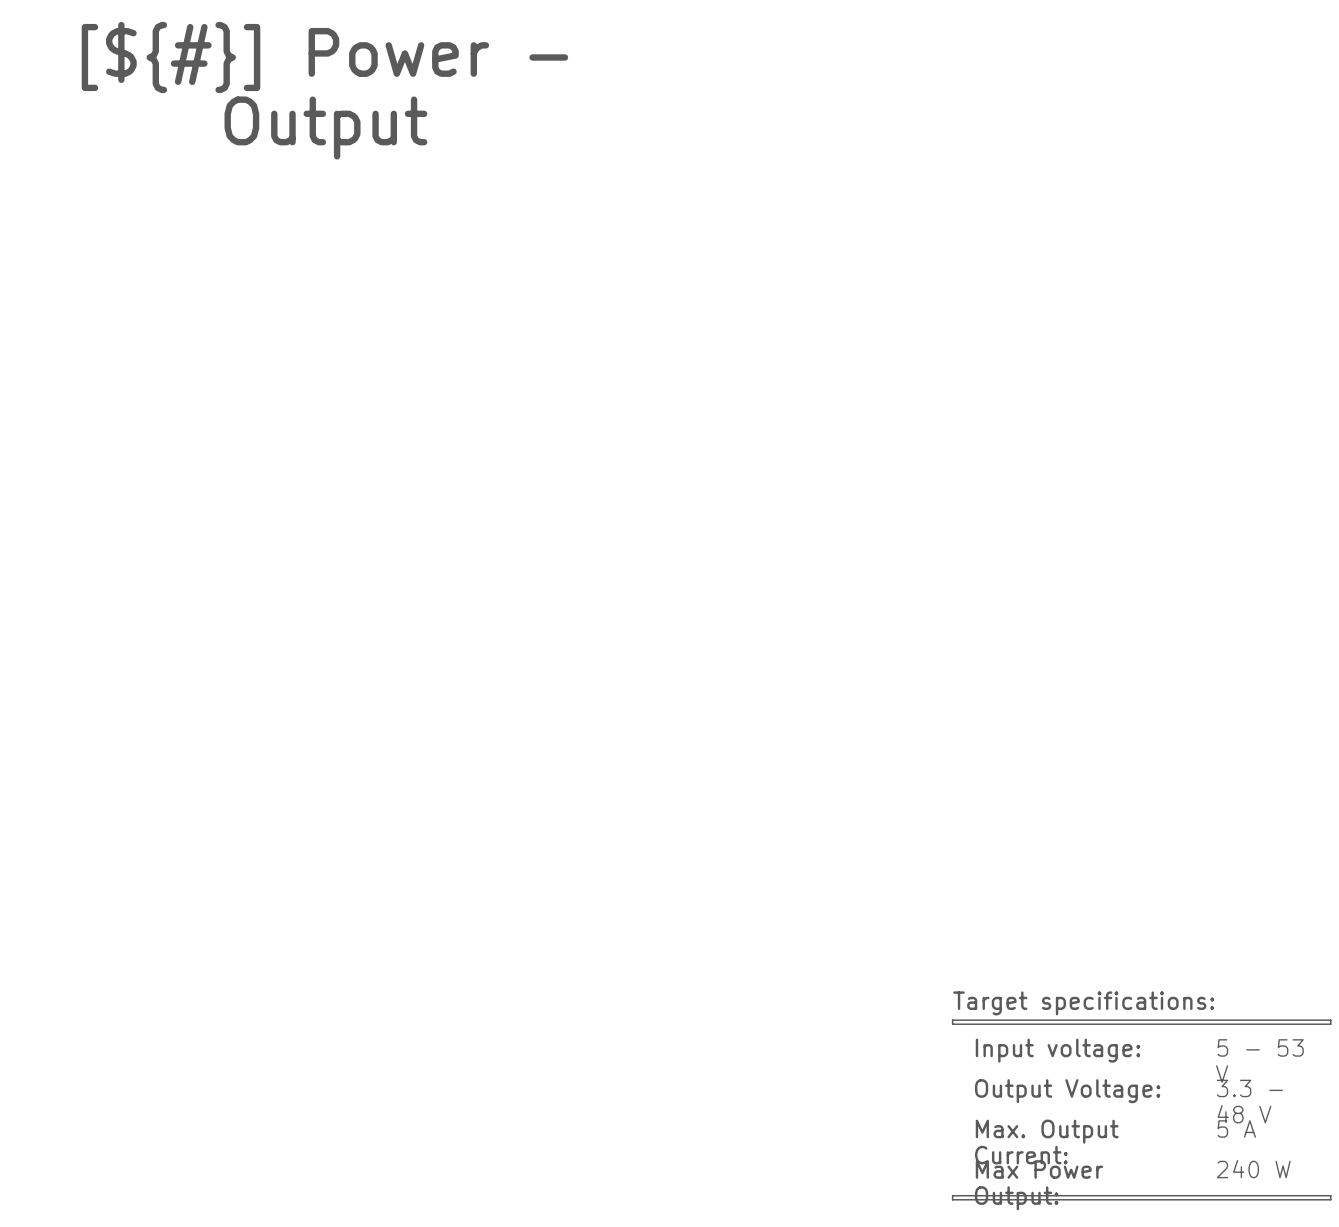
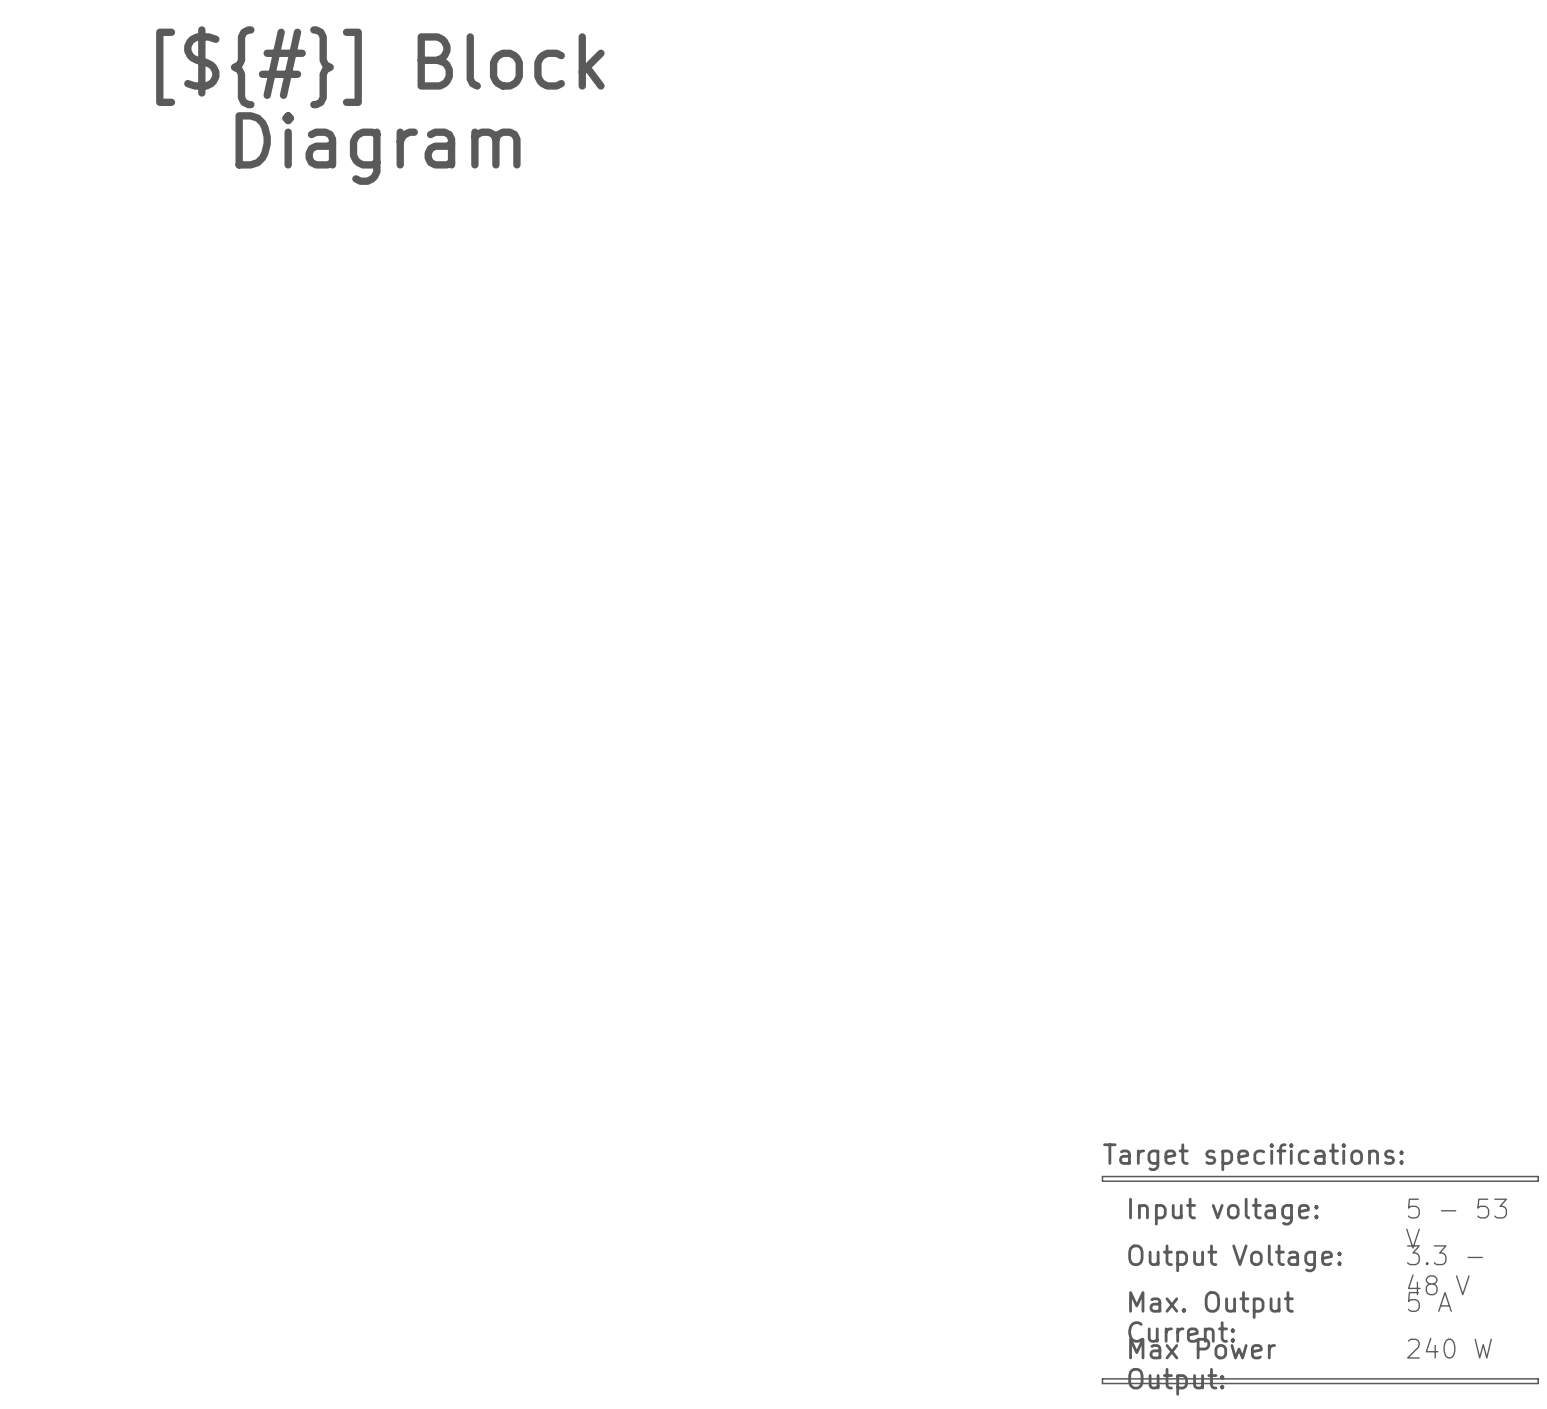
text: [${#}] Power - (324, 57) -> [${#}] Block (380, 67)
text: Output (325, 128) -> Diagram (378, 148)

